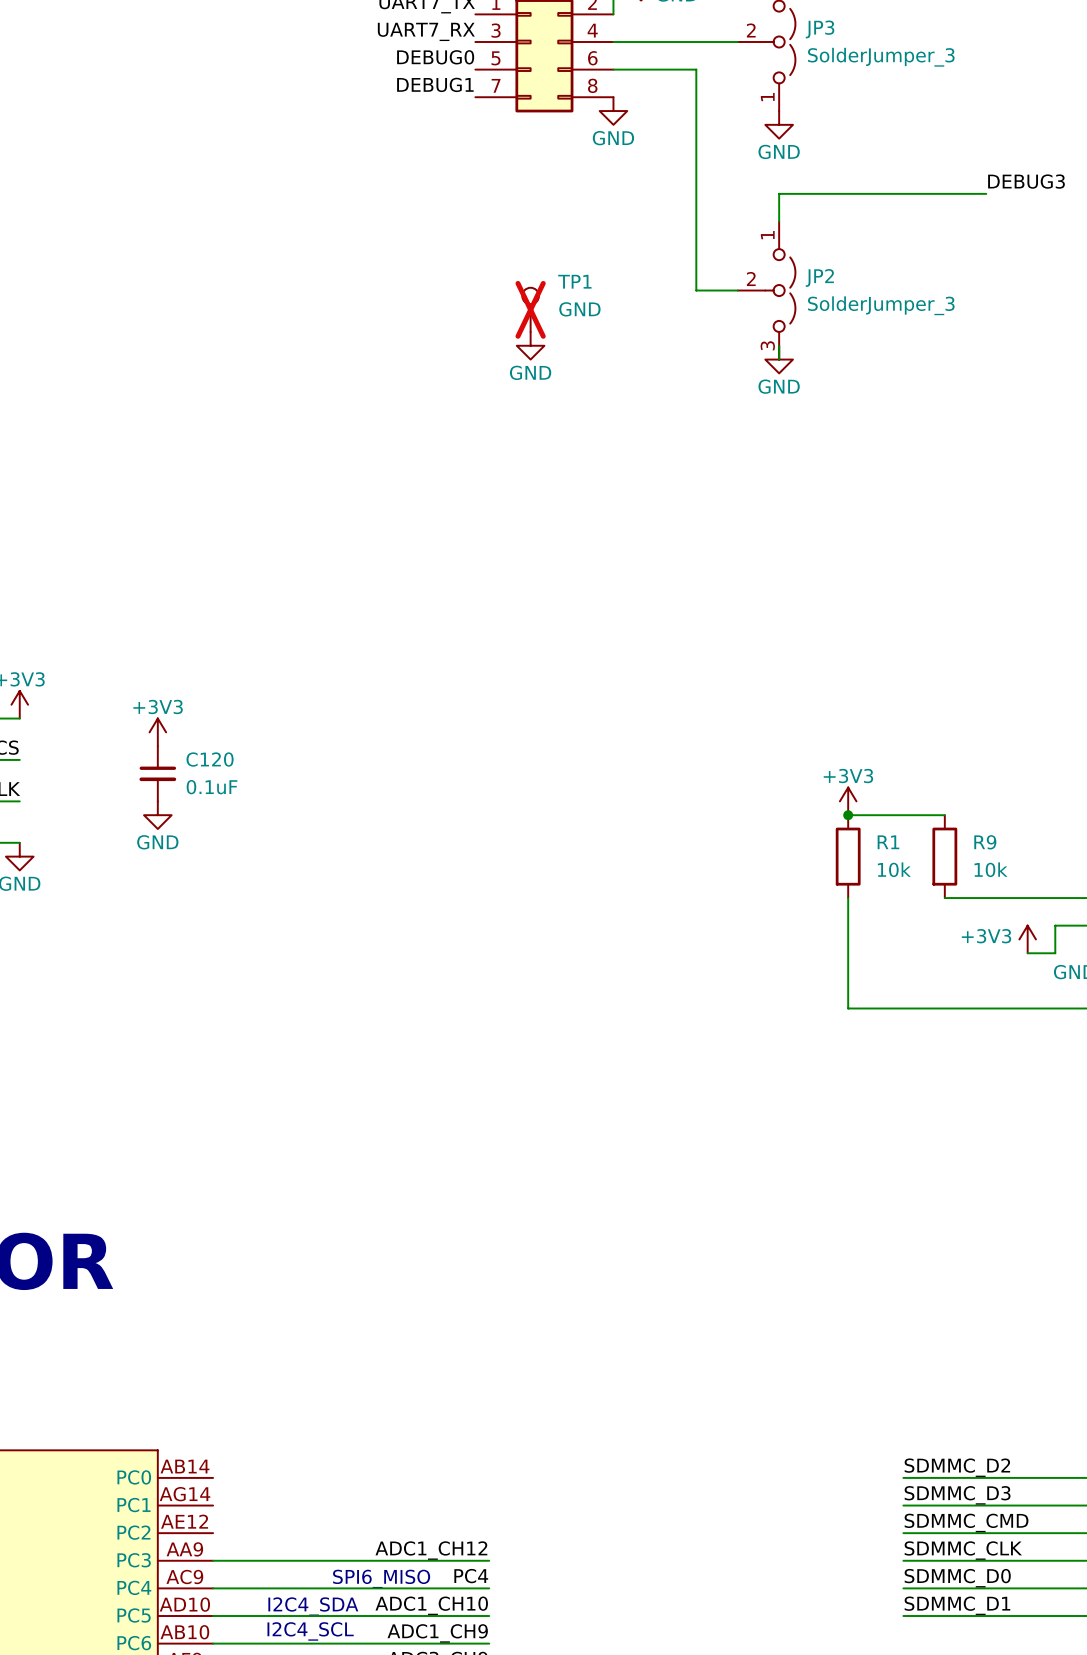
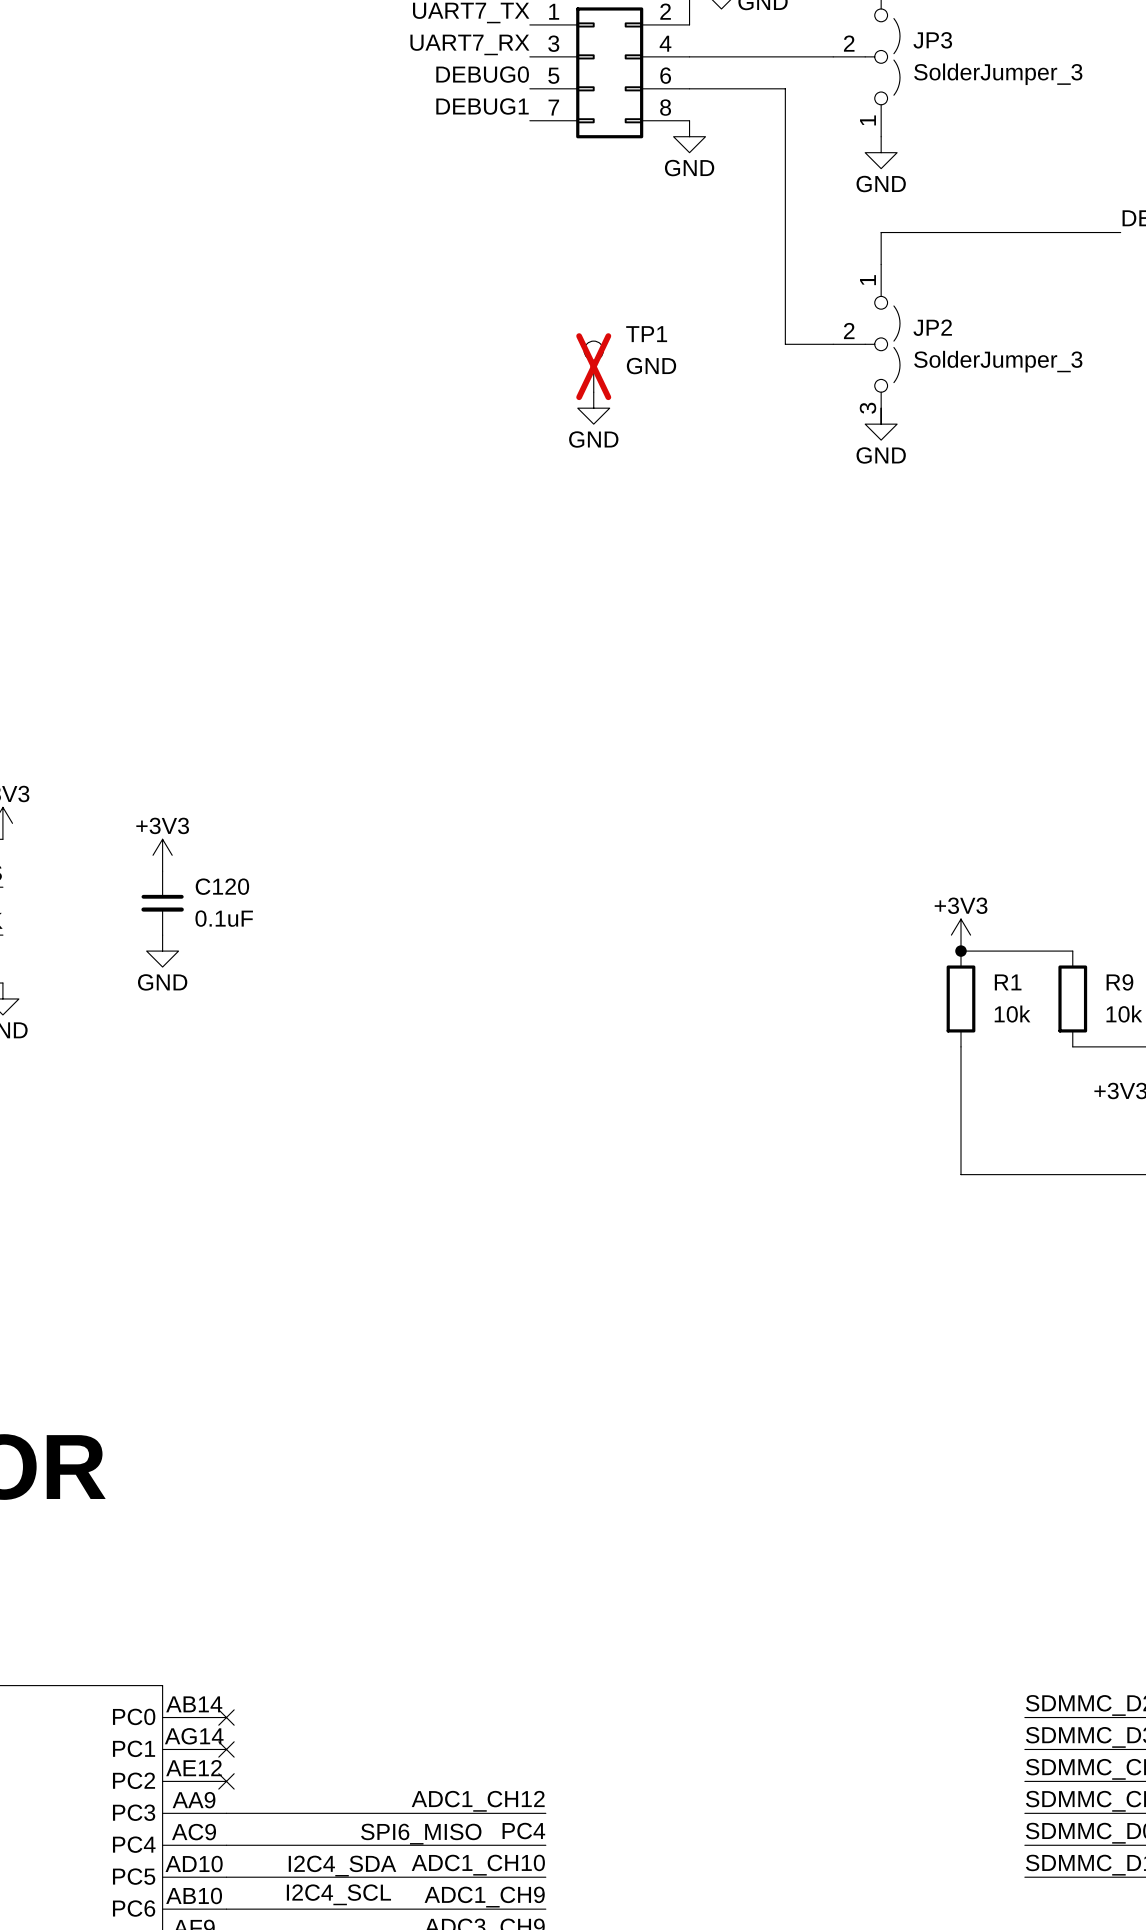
no-connect mark: none -> (226, 1717)
no-connect mark: none -> (226, 1749)
no-connect mark: none -> (226, 1781)

